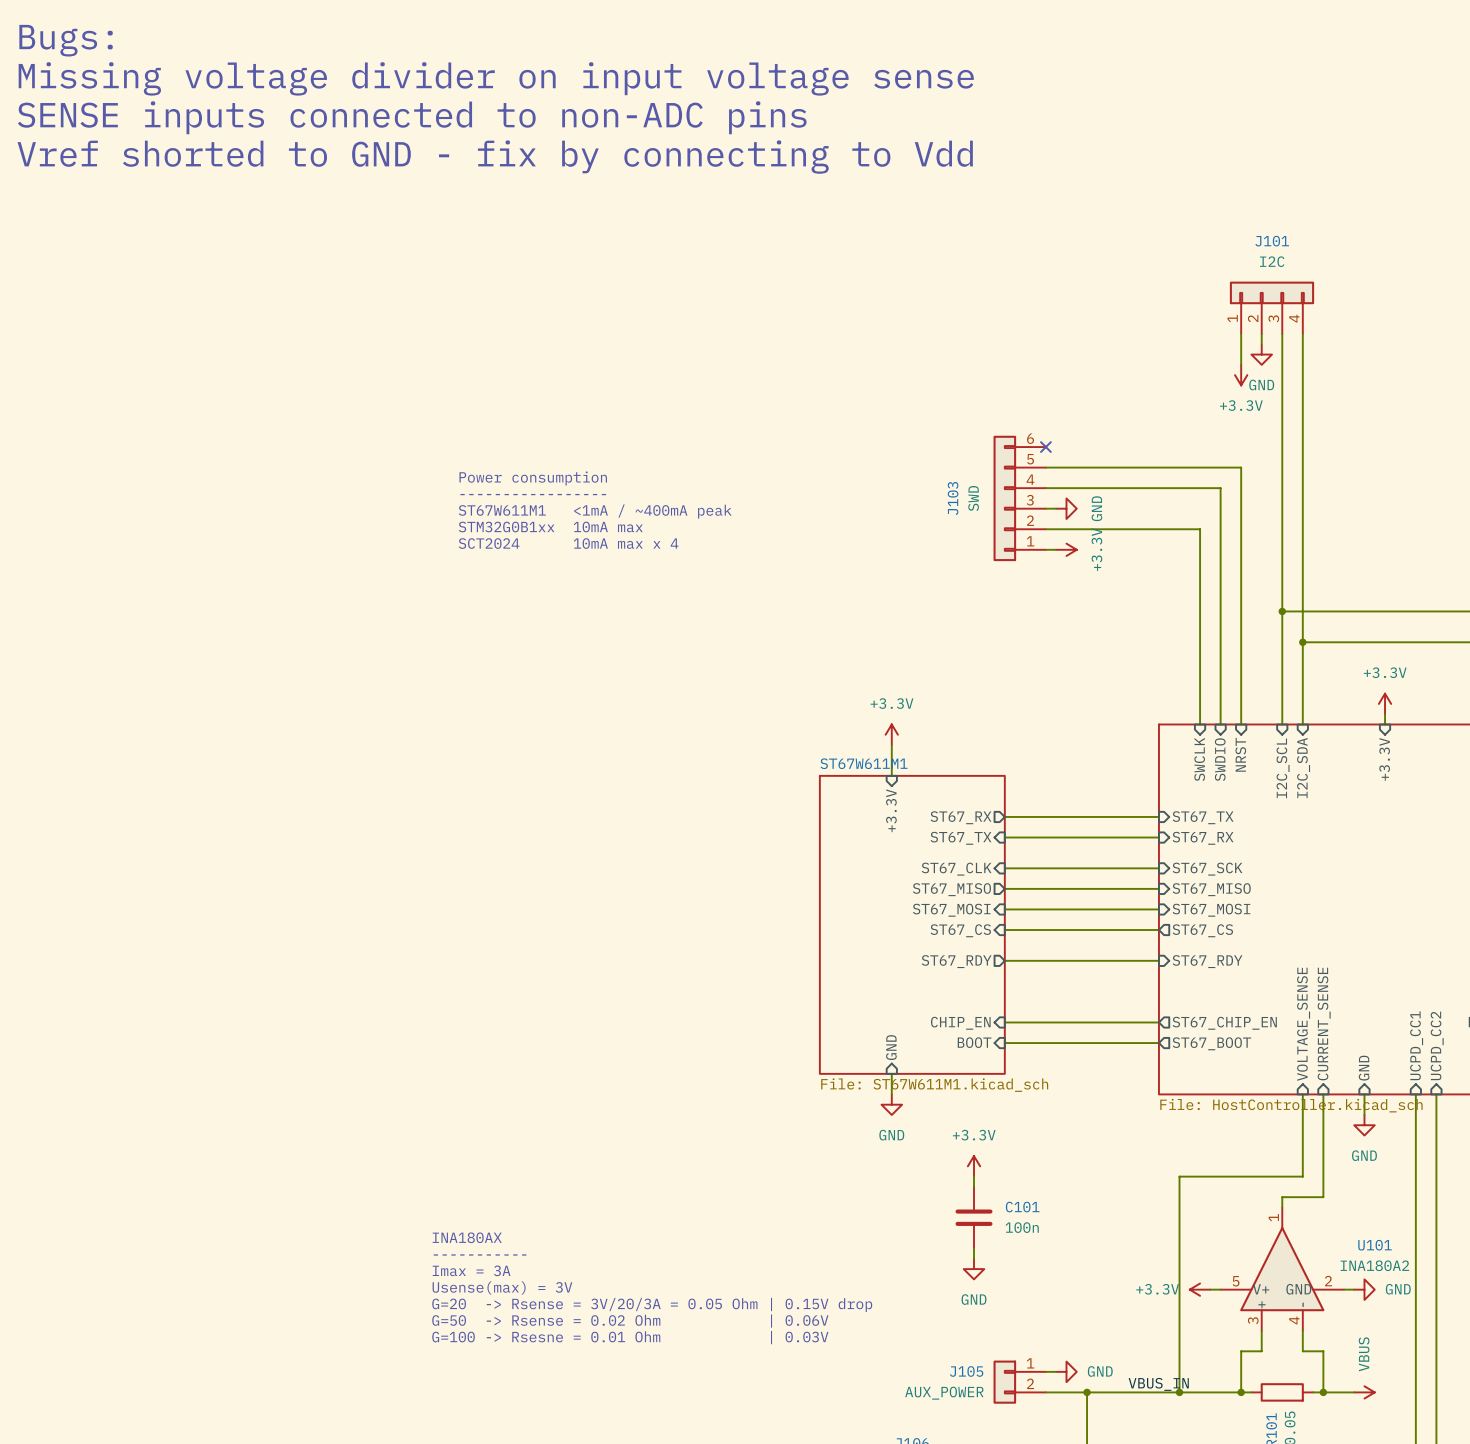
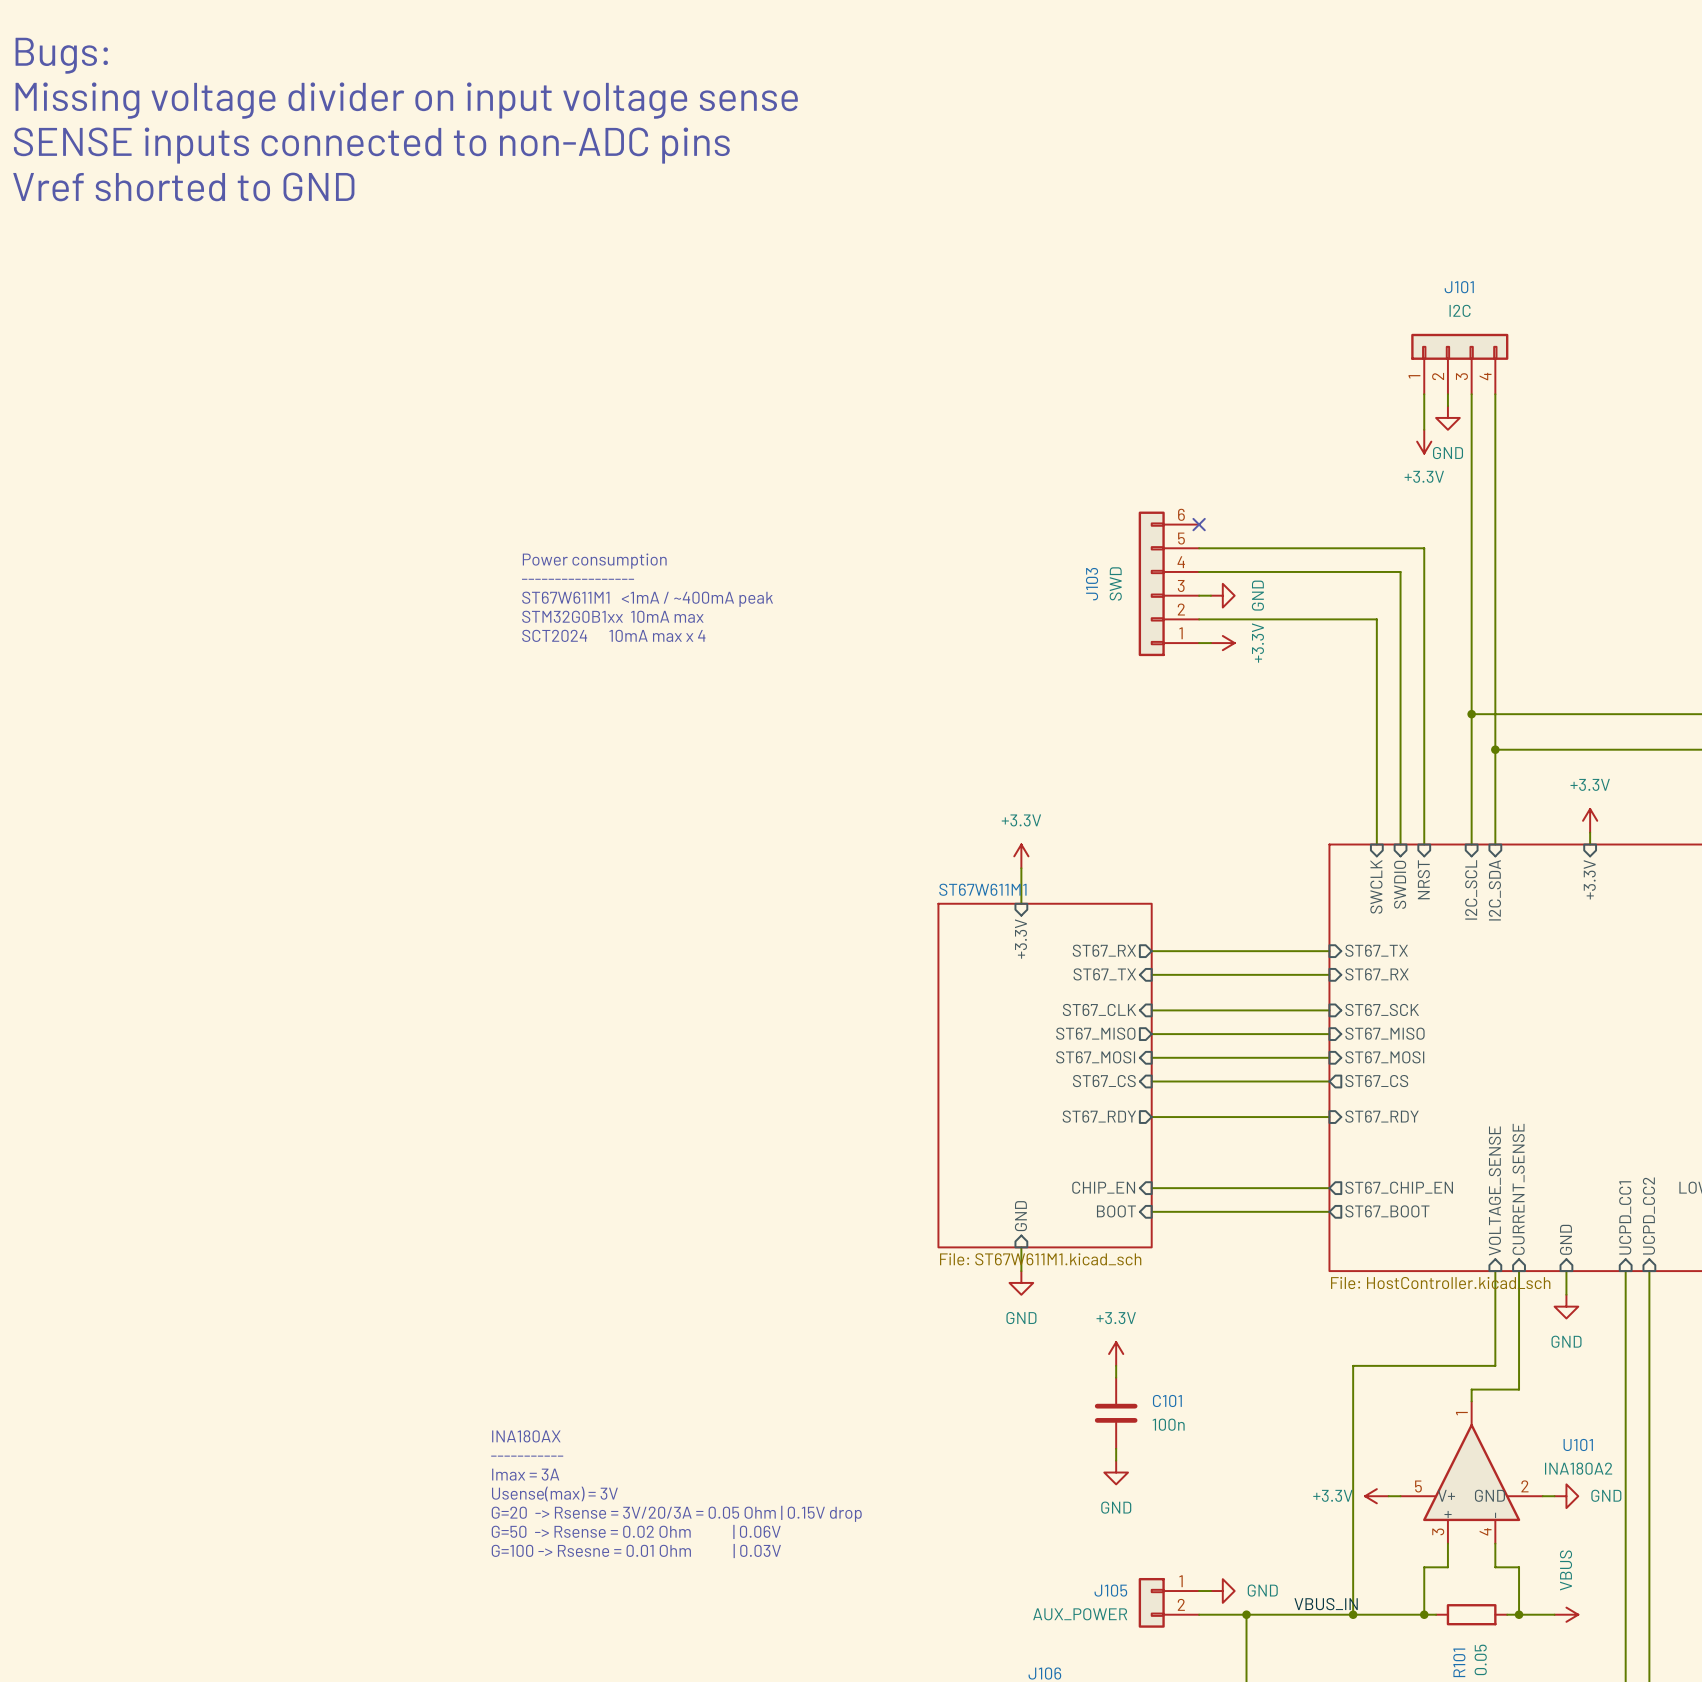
text: Vref shorted to GND - fix by connecting to Vdd (495, 157) -> Vref shorted to GND (183, 186)

